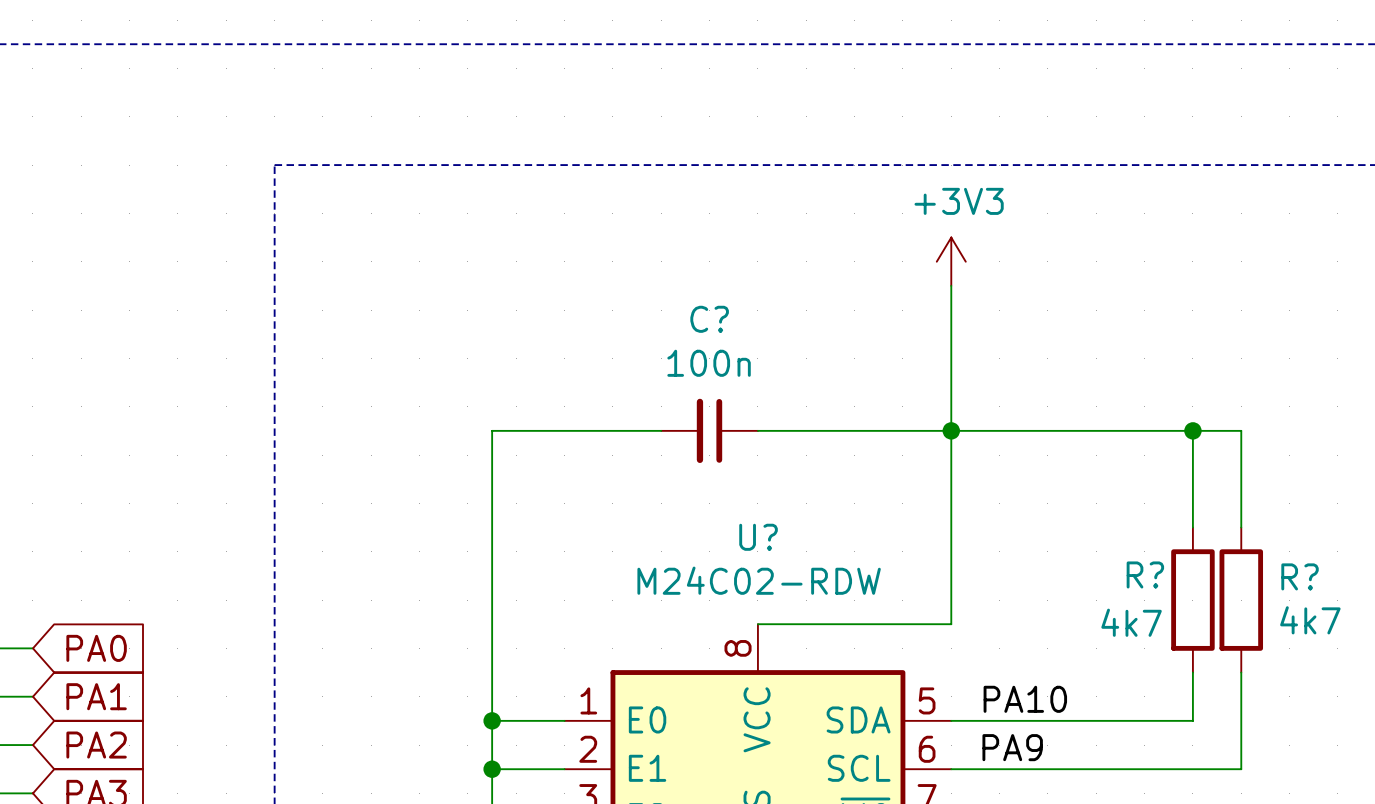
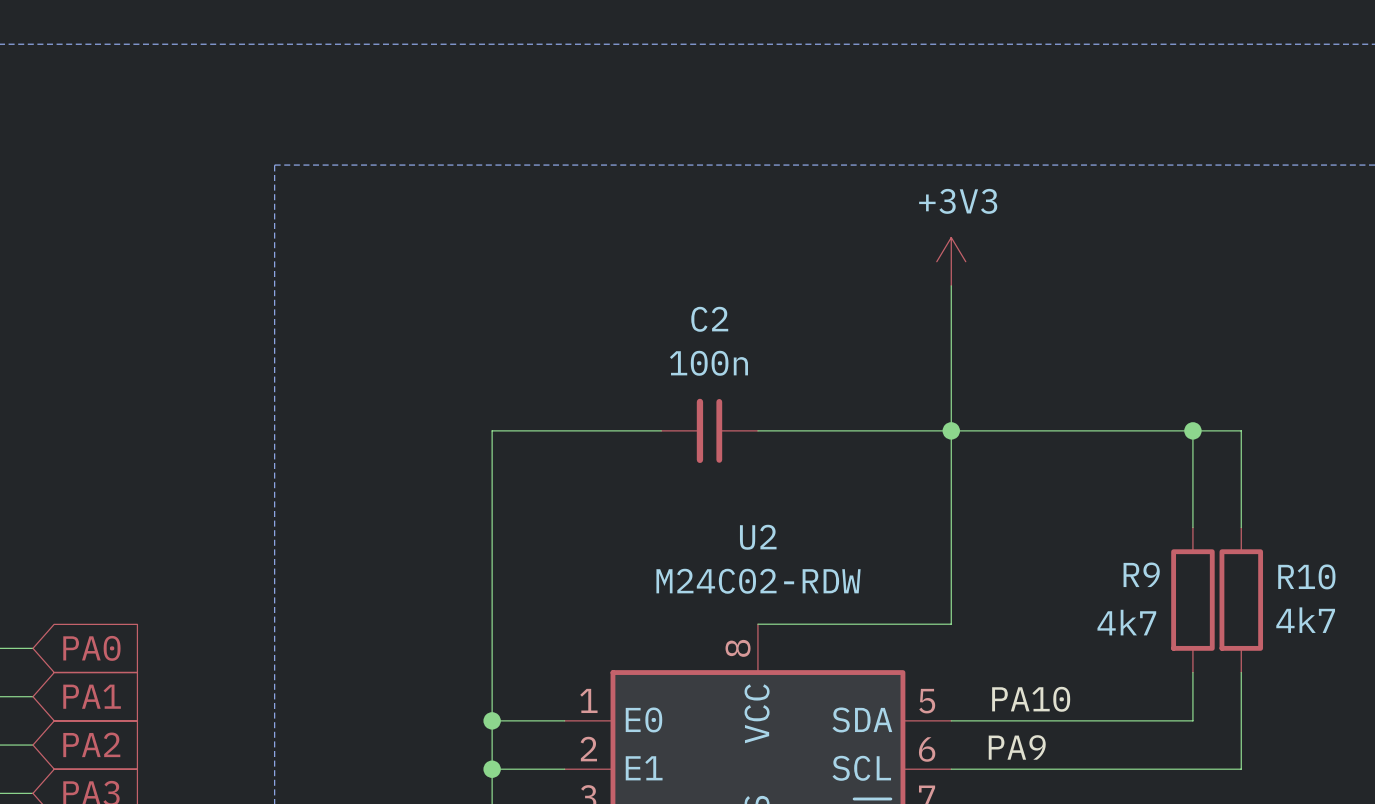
C? name: C? (709, 319) -> C2 (709, 319)
U? name: U? (758, 537) -> U2 (758, 537)
R? name: R? (1145, 574) -> R9 (1141, 574)
R? name: R? (1300, 576) -> R10 (1306, 576)

